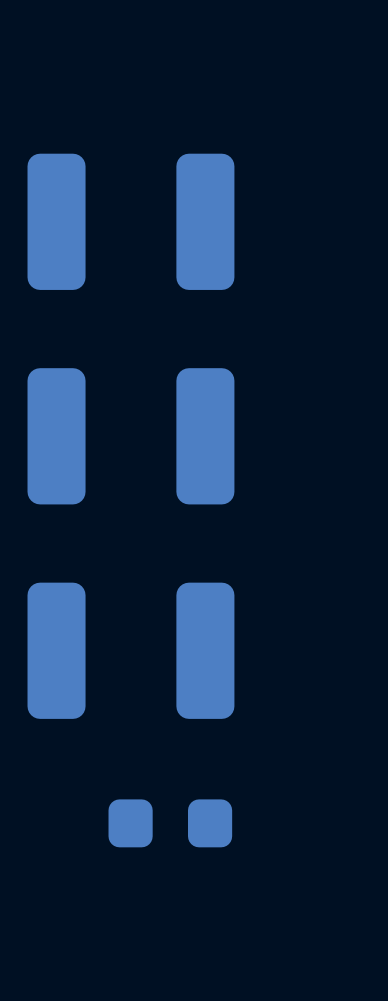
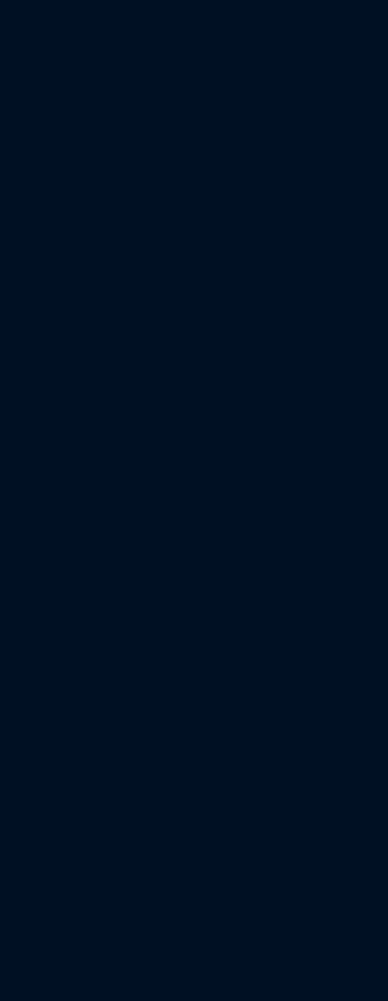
part: (130, 221) -> none
part: (130, 436) -> none
part: (130, 650) -> none
part: (170, 823) -> none

